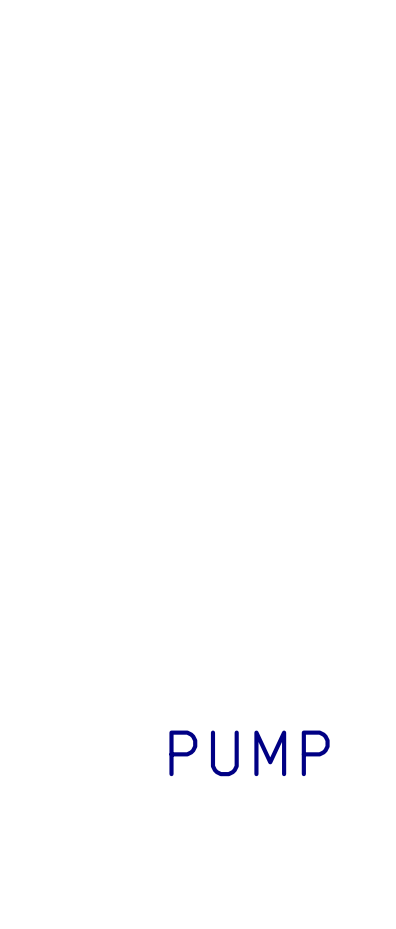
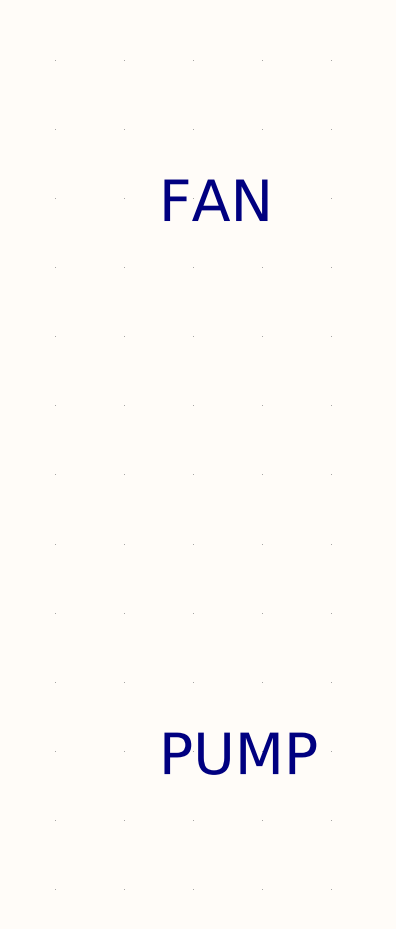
text: none -> FAN (216, 200)

